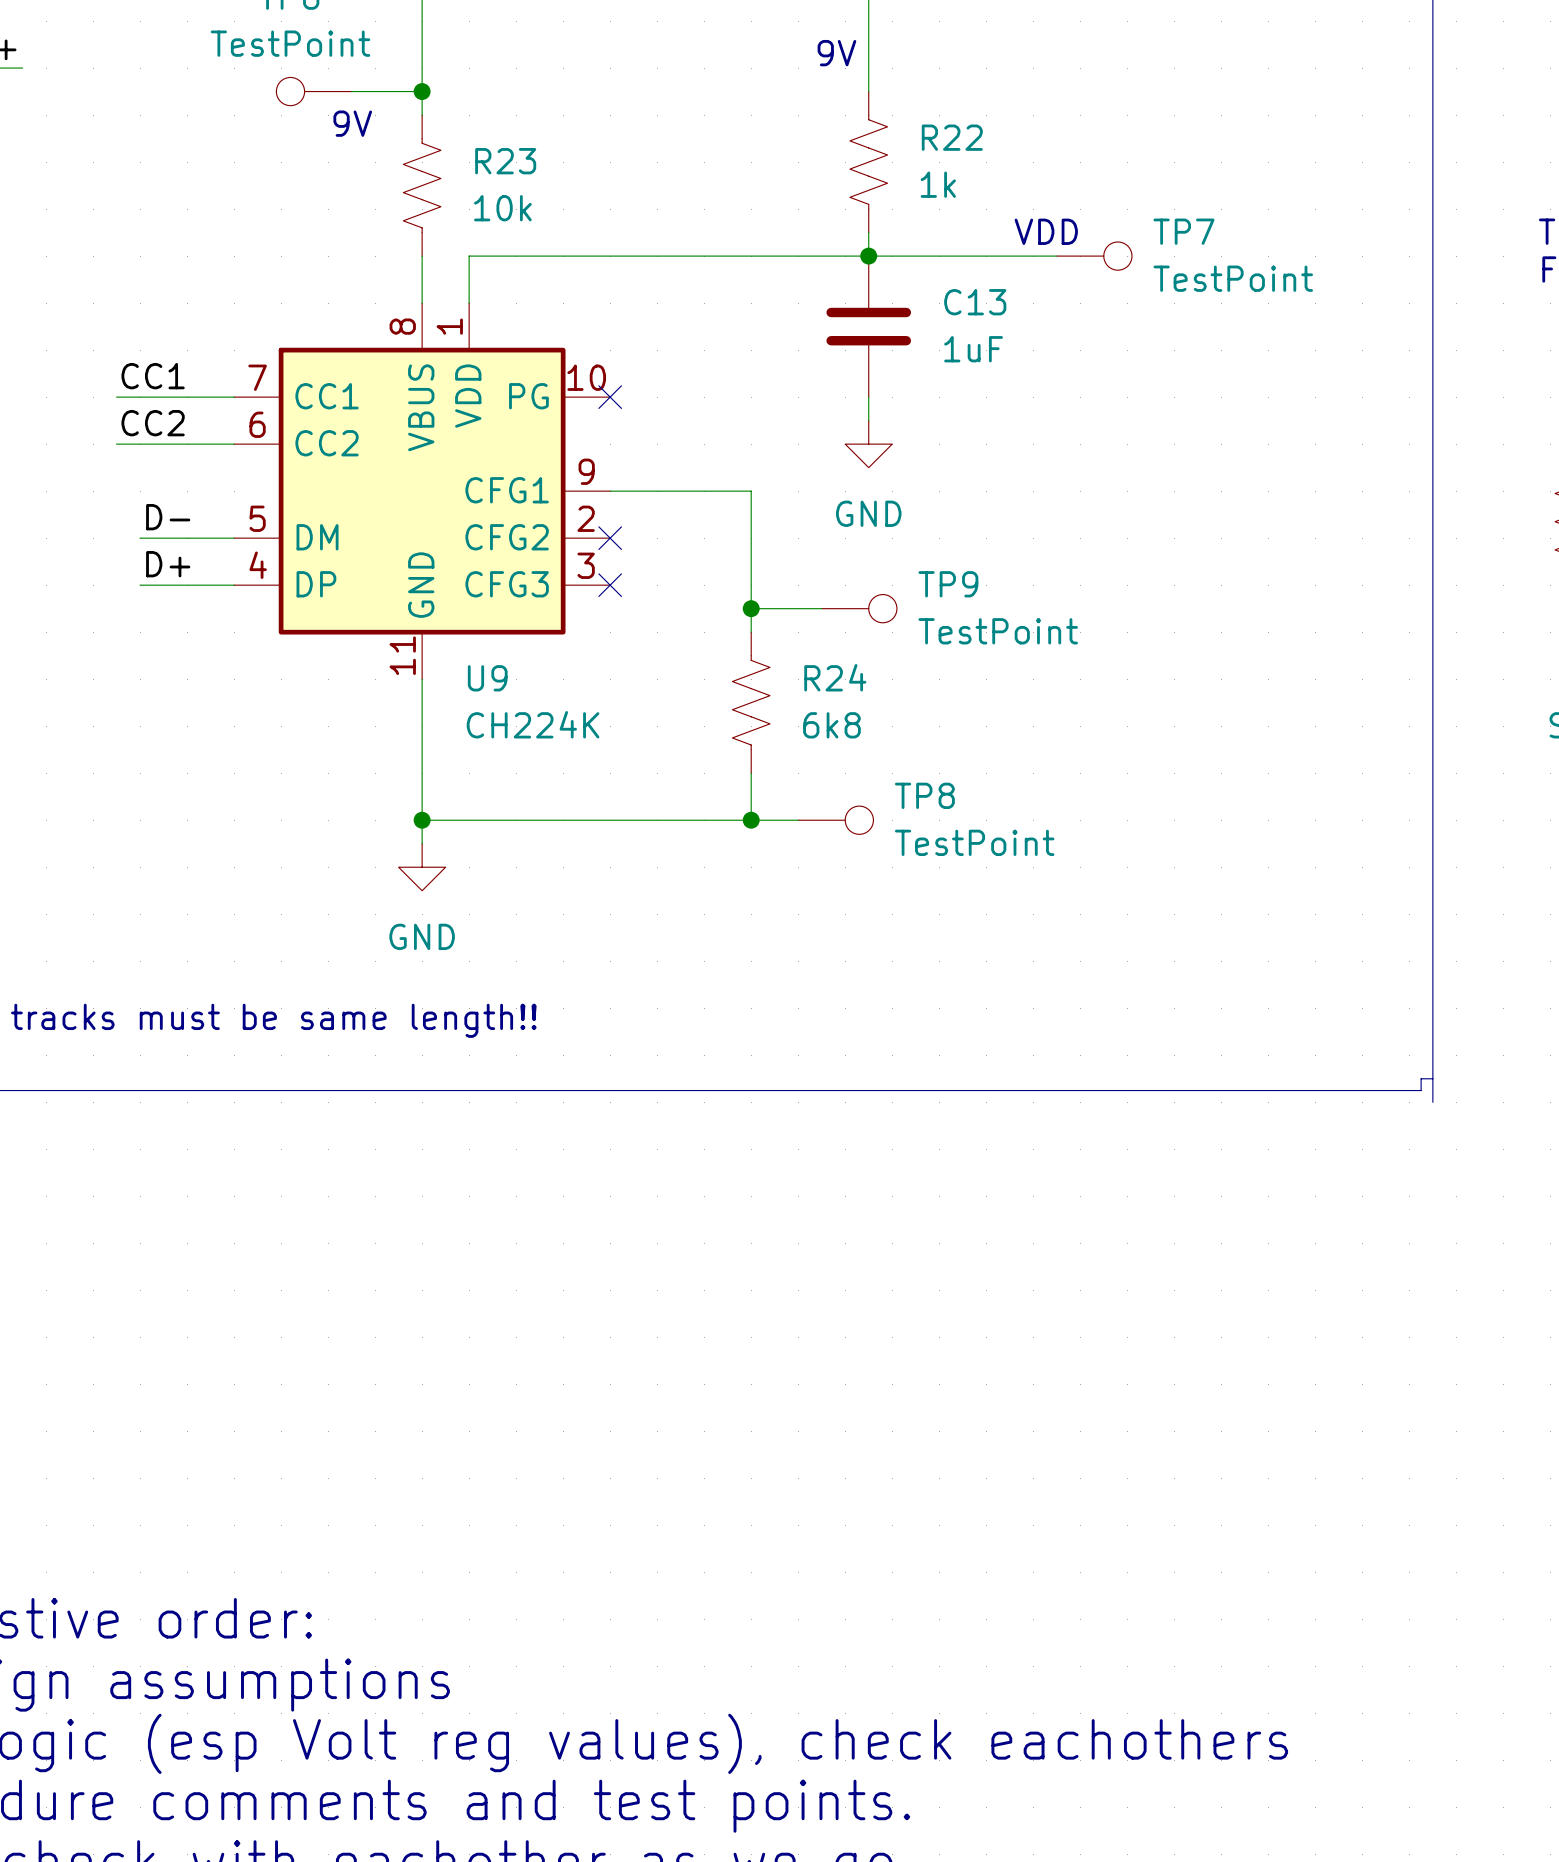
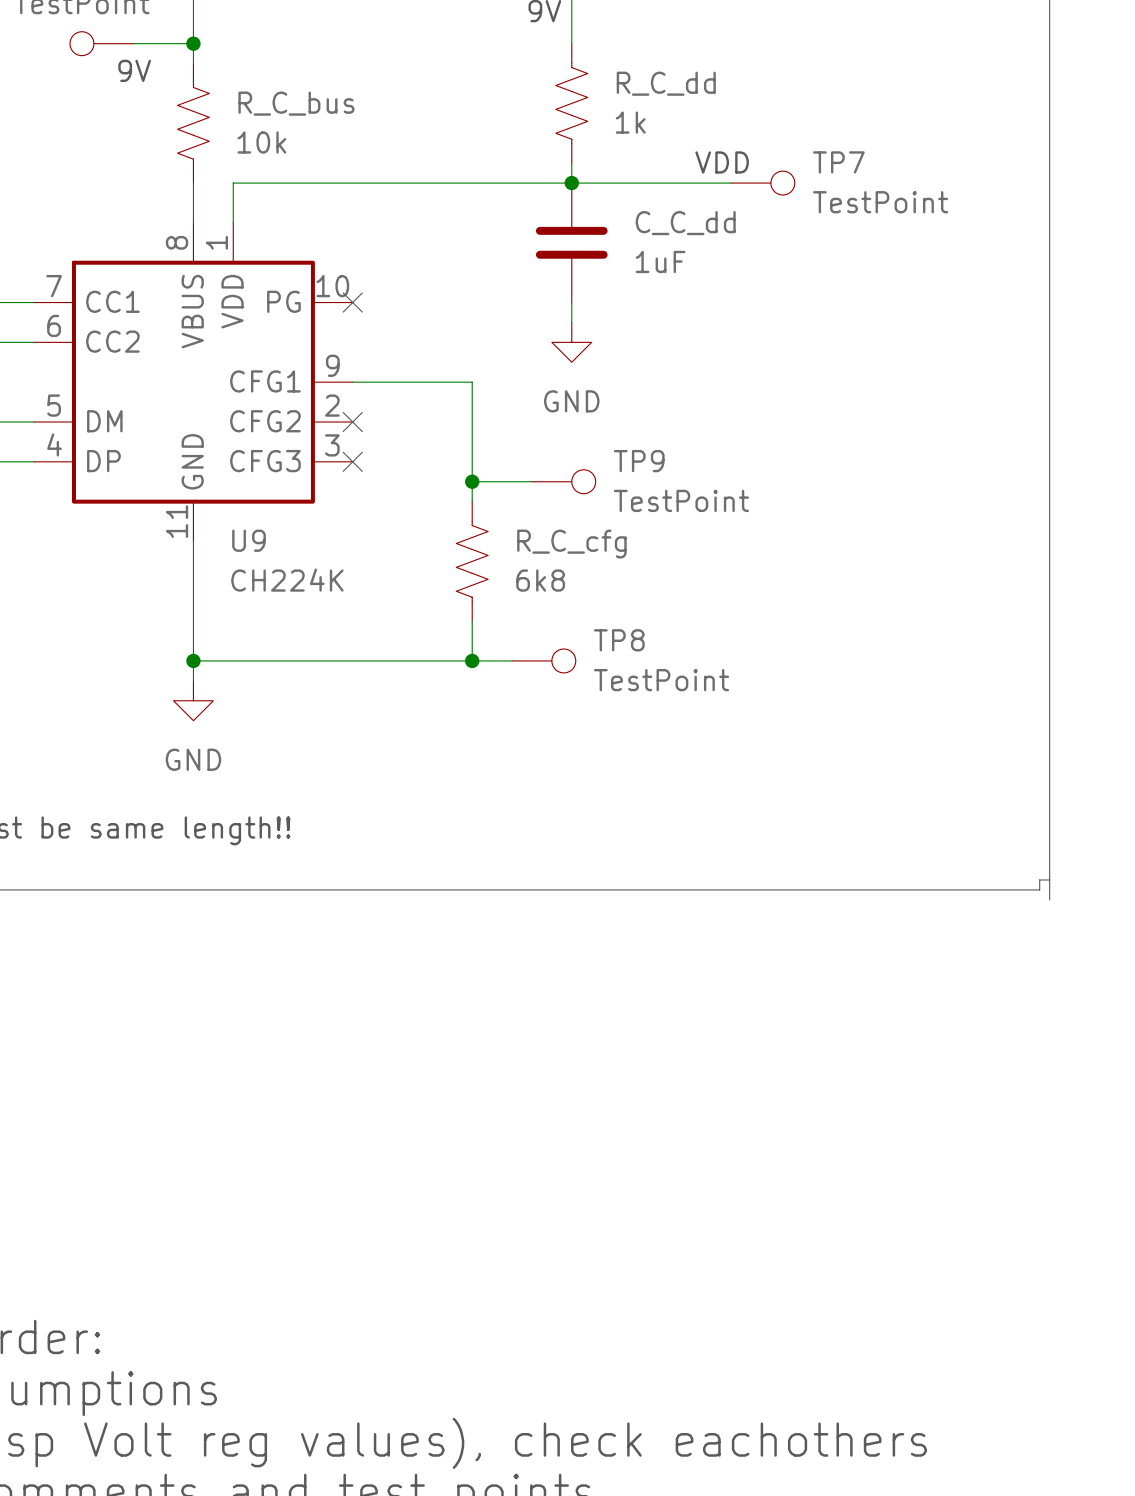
R22 name: R22 (952, 137) -> R_C_dd (666, 83)
R23 name: R23 (505, 161) -> R_C_bus (296, 103)
C13 name: C13 (975, 302) -> C_C_dd (685, 223)
R24 name: R24 (835, 677) -> R_C_cfg (571, 544)

